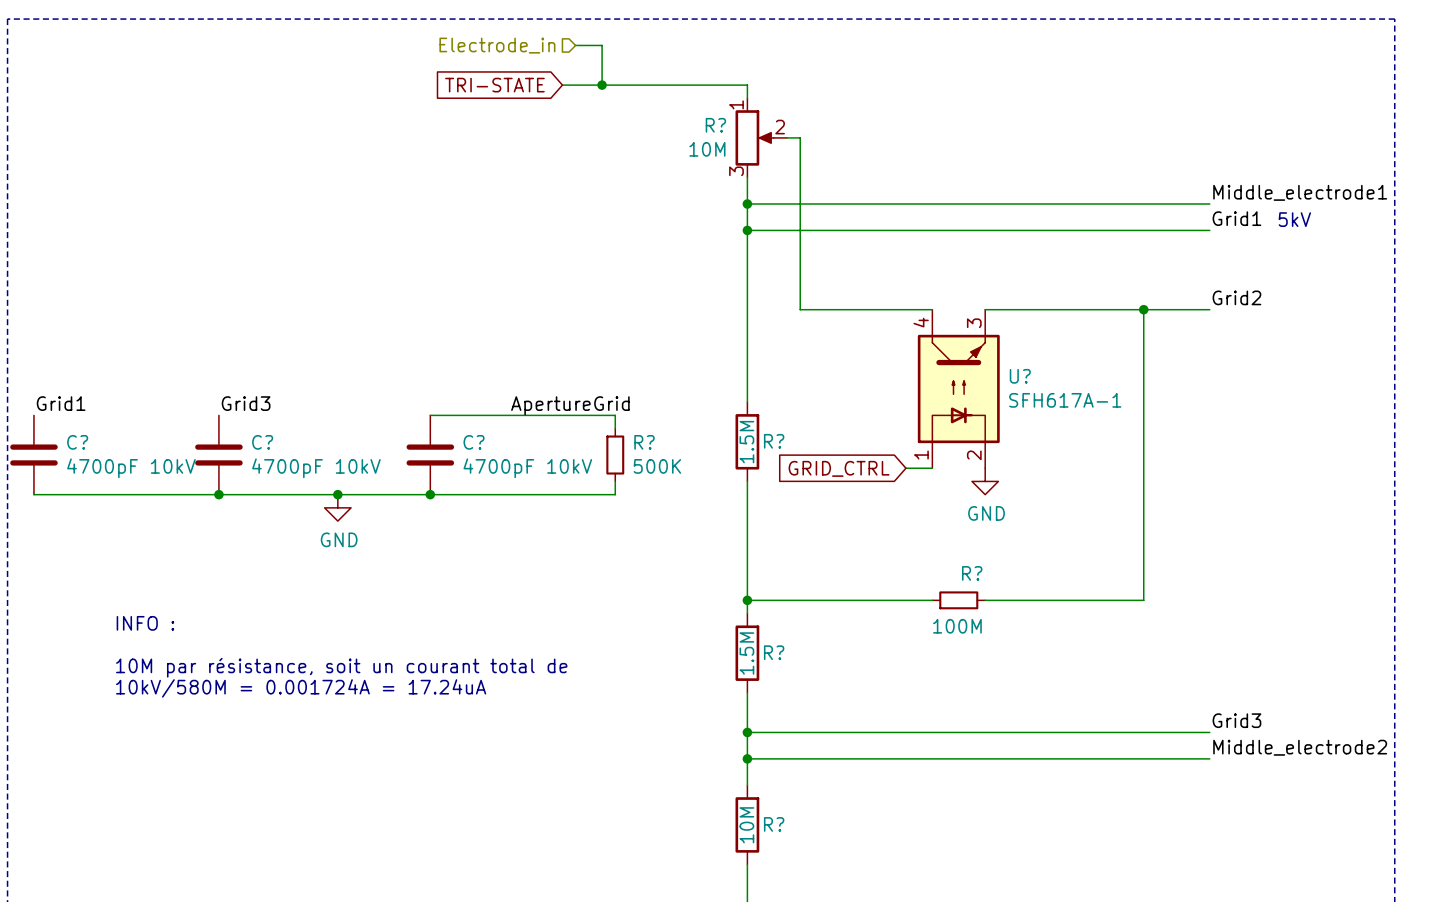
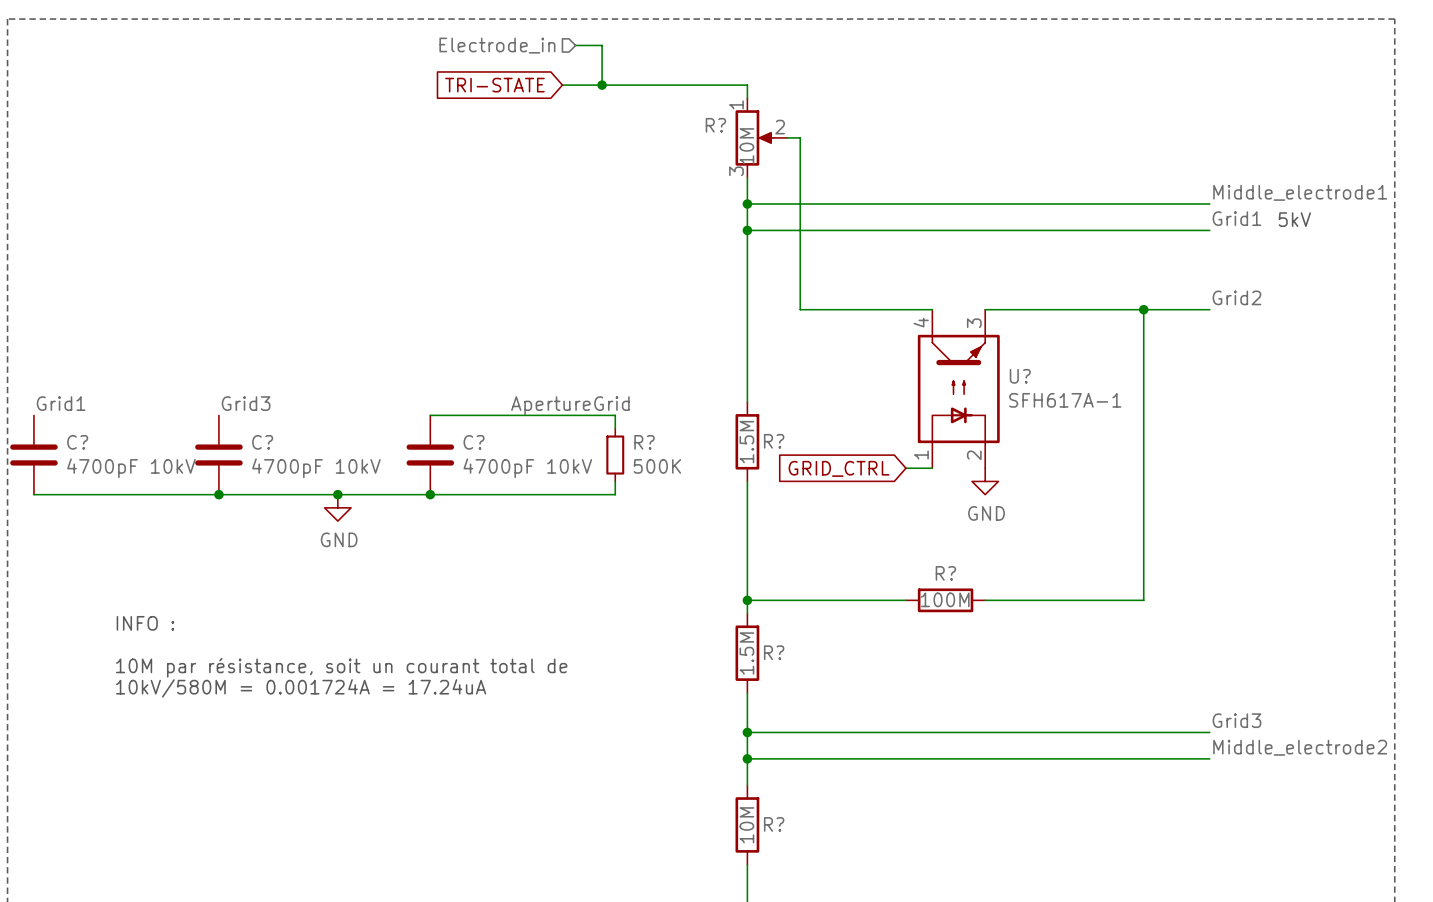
R? value rotation: 0° (707, 149) -> 90° counterclockwise (746, 146)
R?: none -> 100M (945, 600)
R?: 100M (958, 600) -> none

